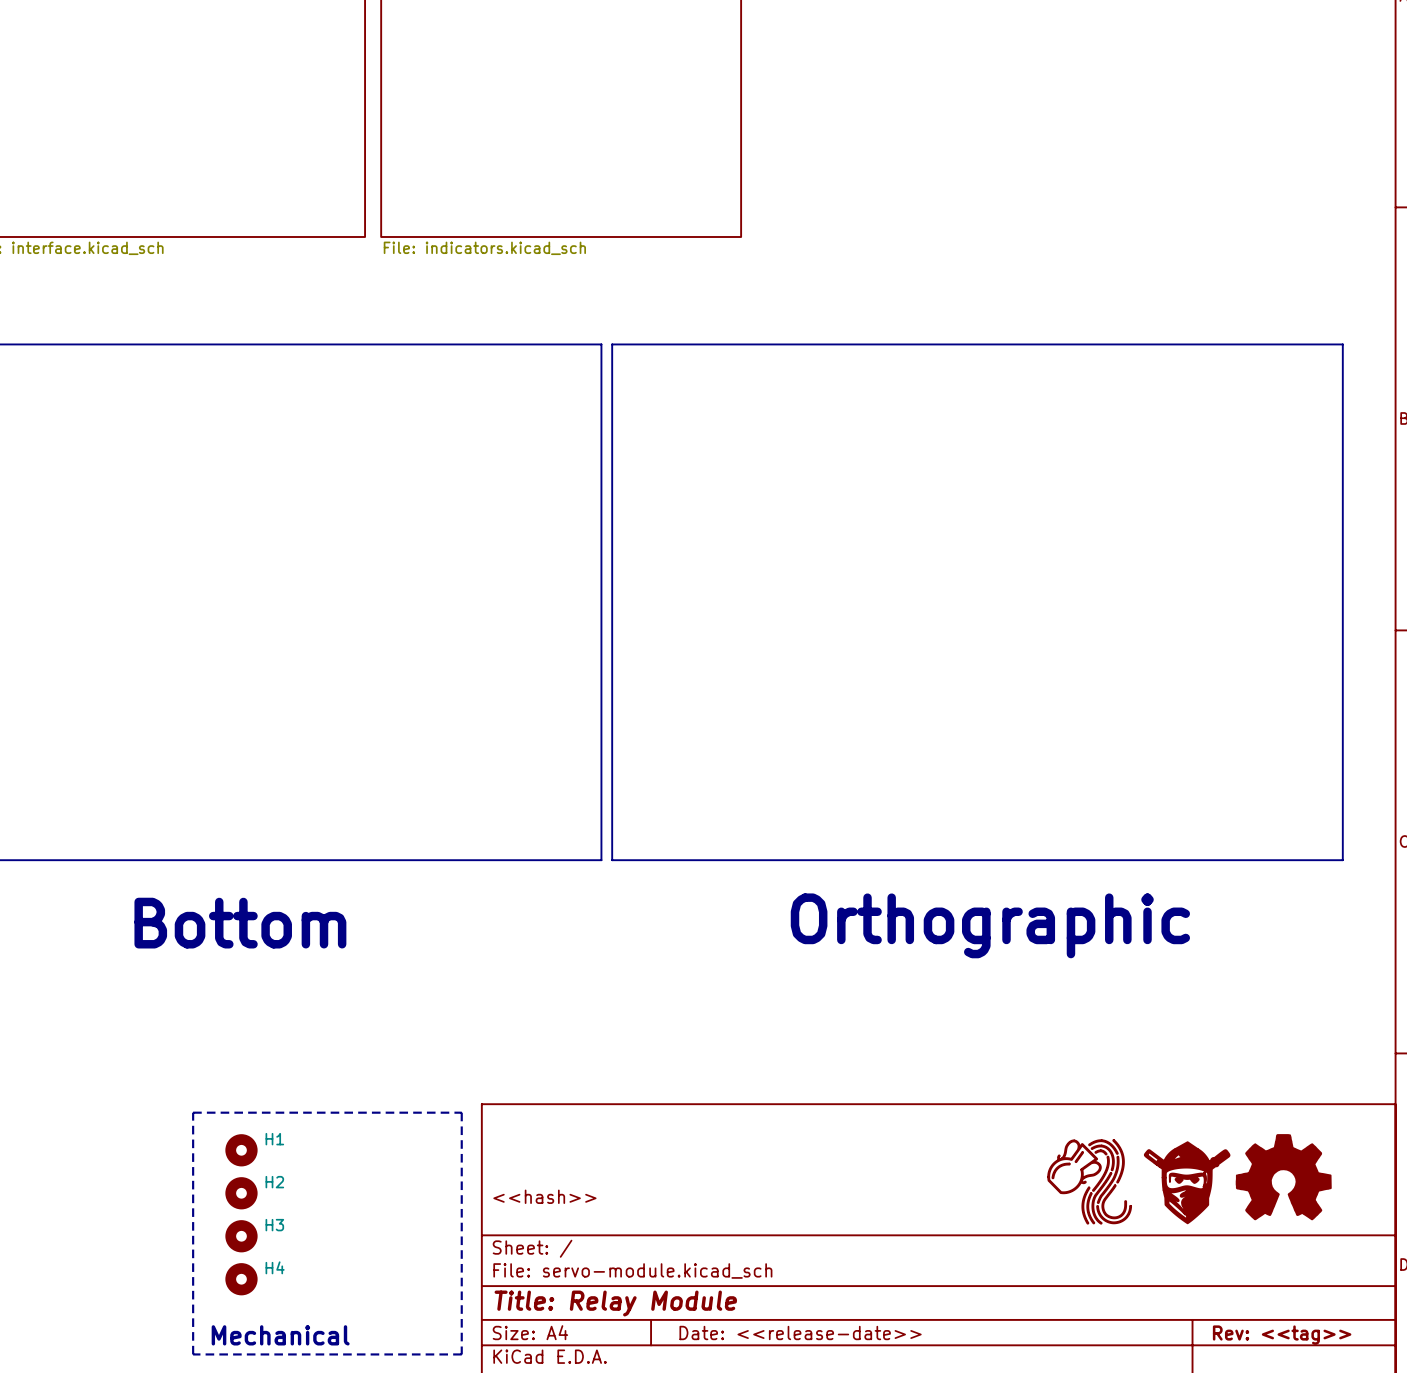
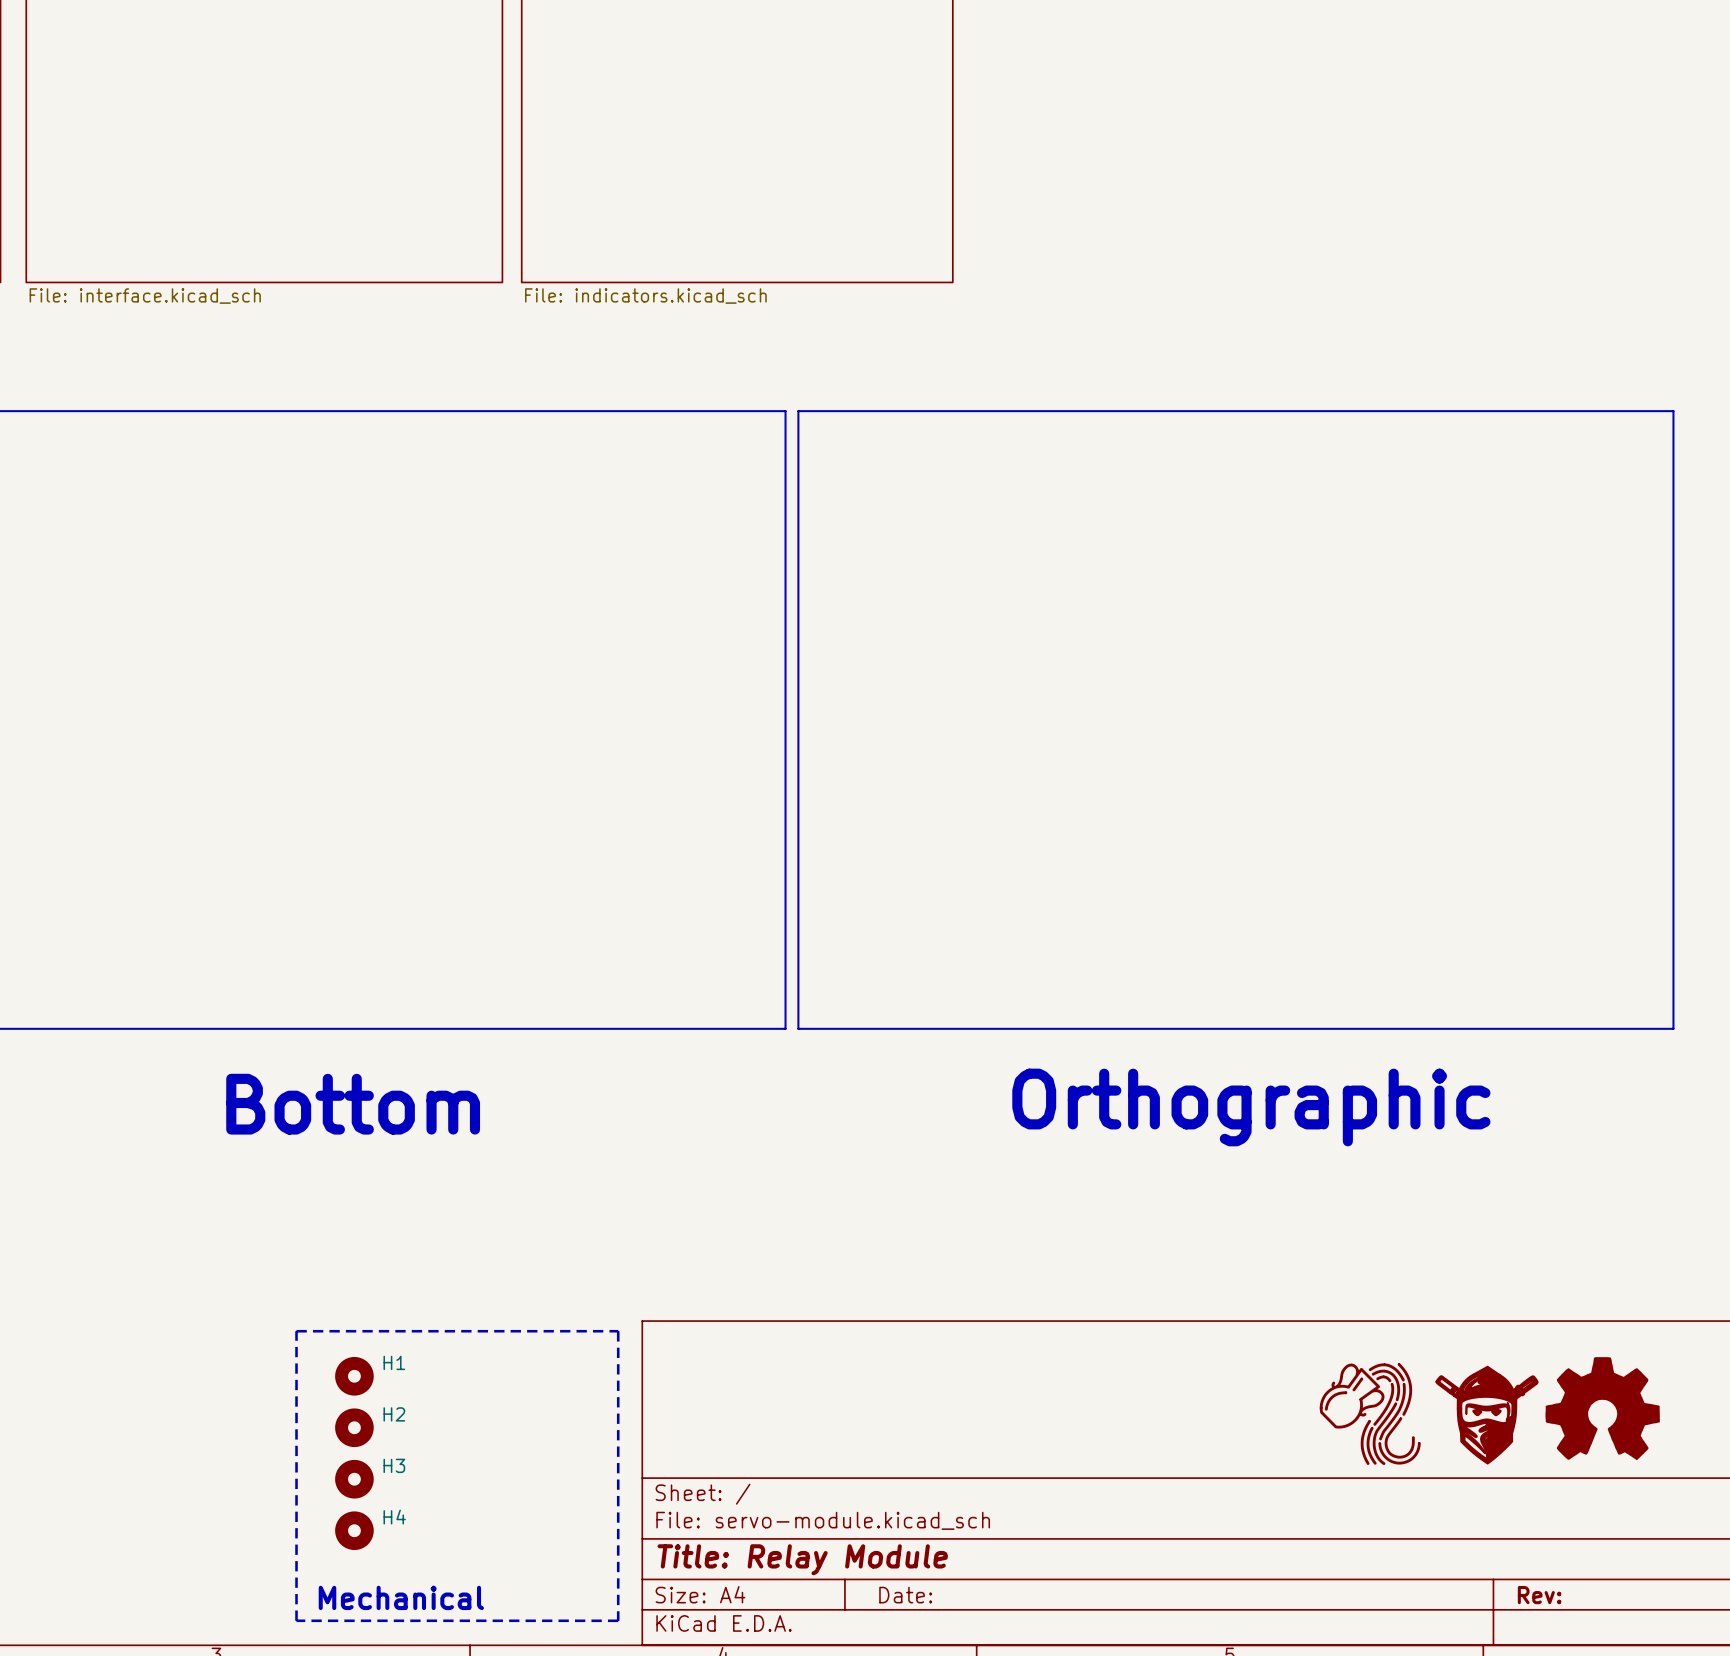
title block: <<hash>> (544, 1196) -> none
title block: Date: <<release-date>> (800, 1332) -> Date: (905, 1595)
title block: Rev: <<tag>> (1282, 1335) -> Rev: (1539, 1595)

